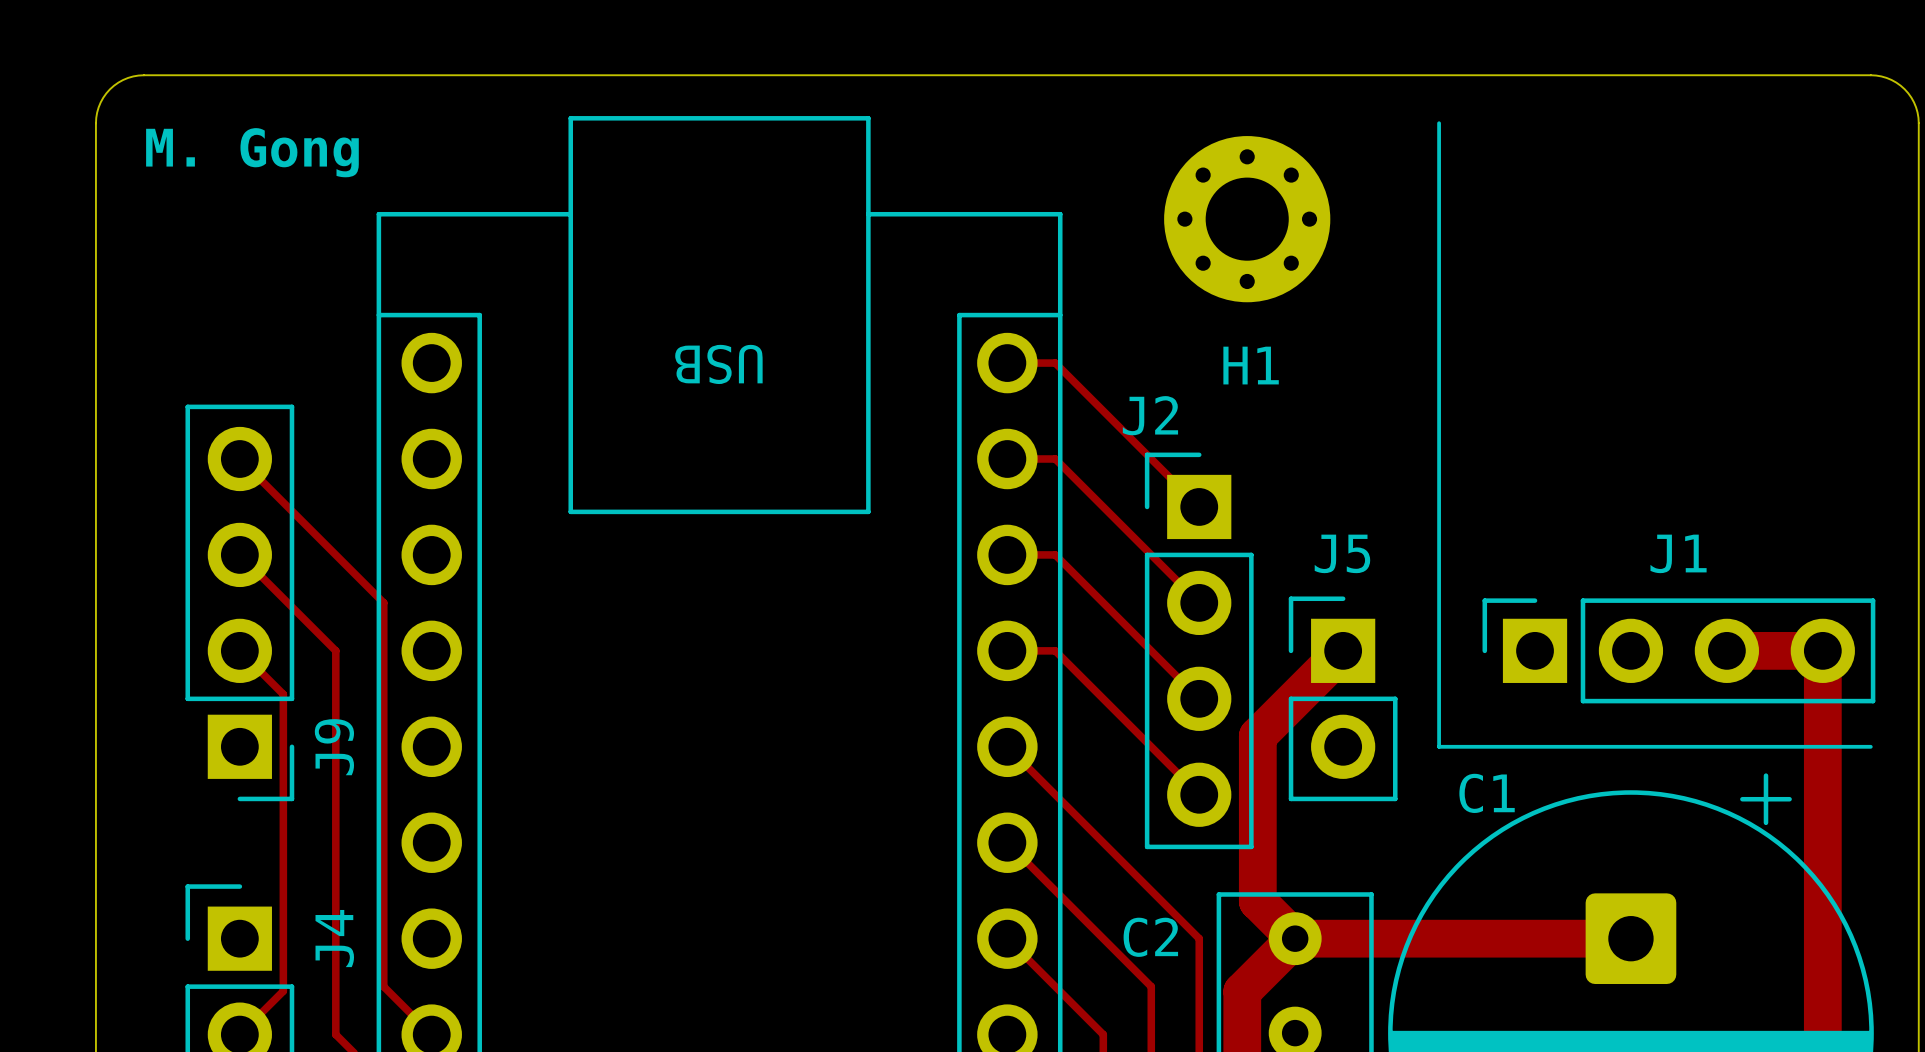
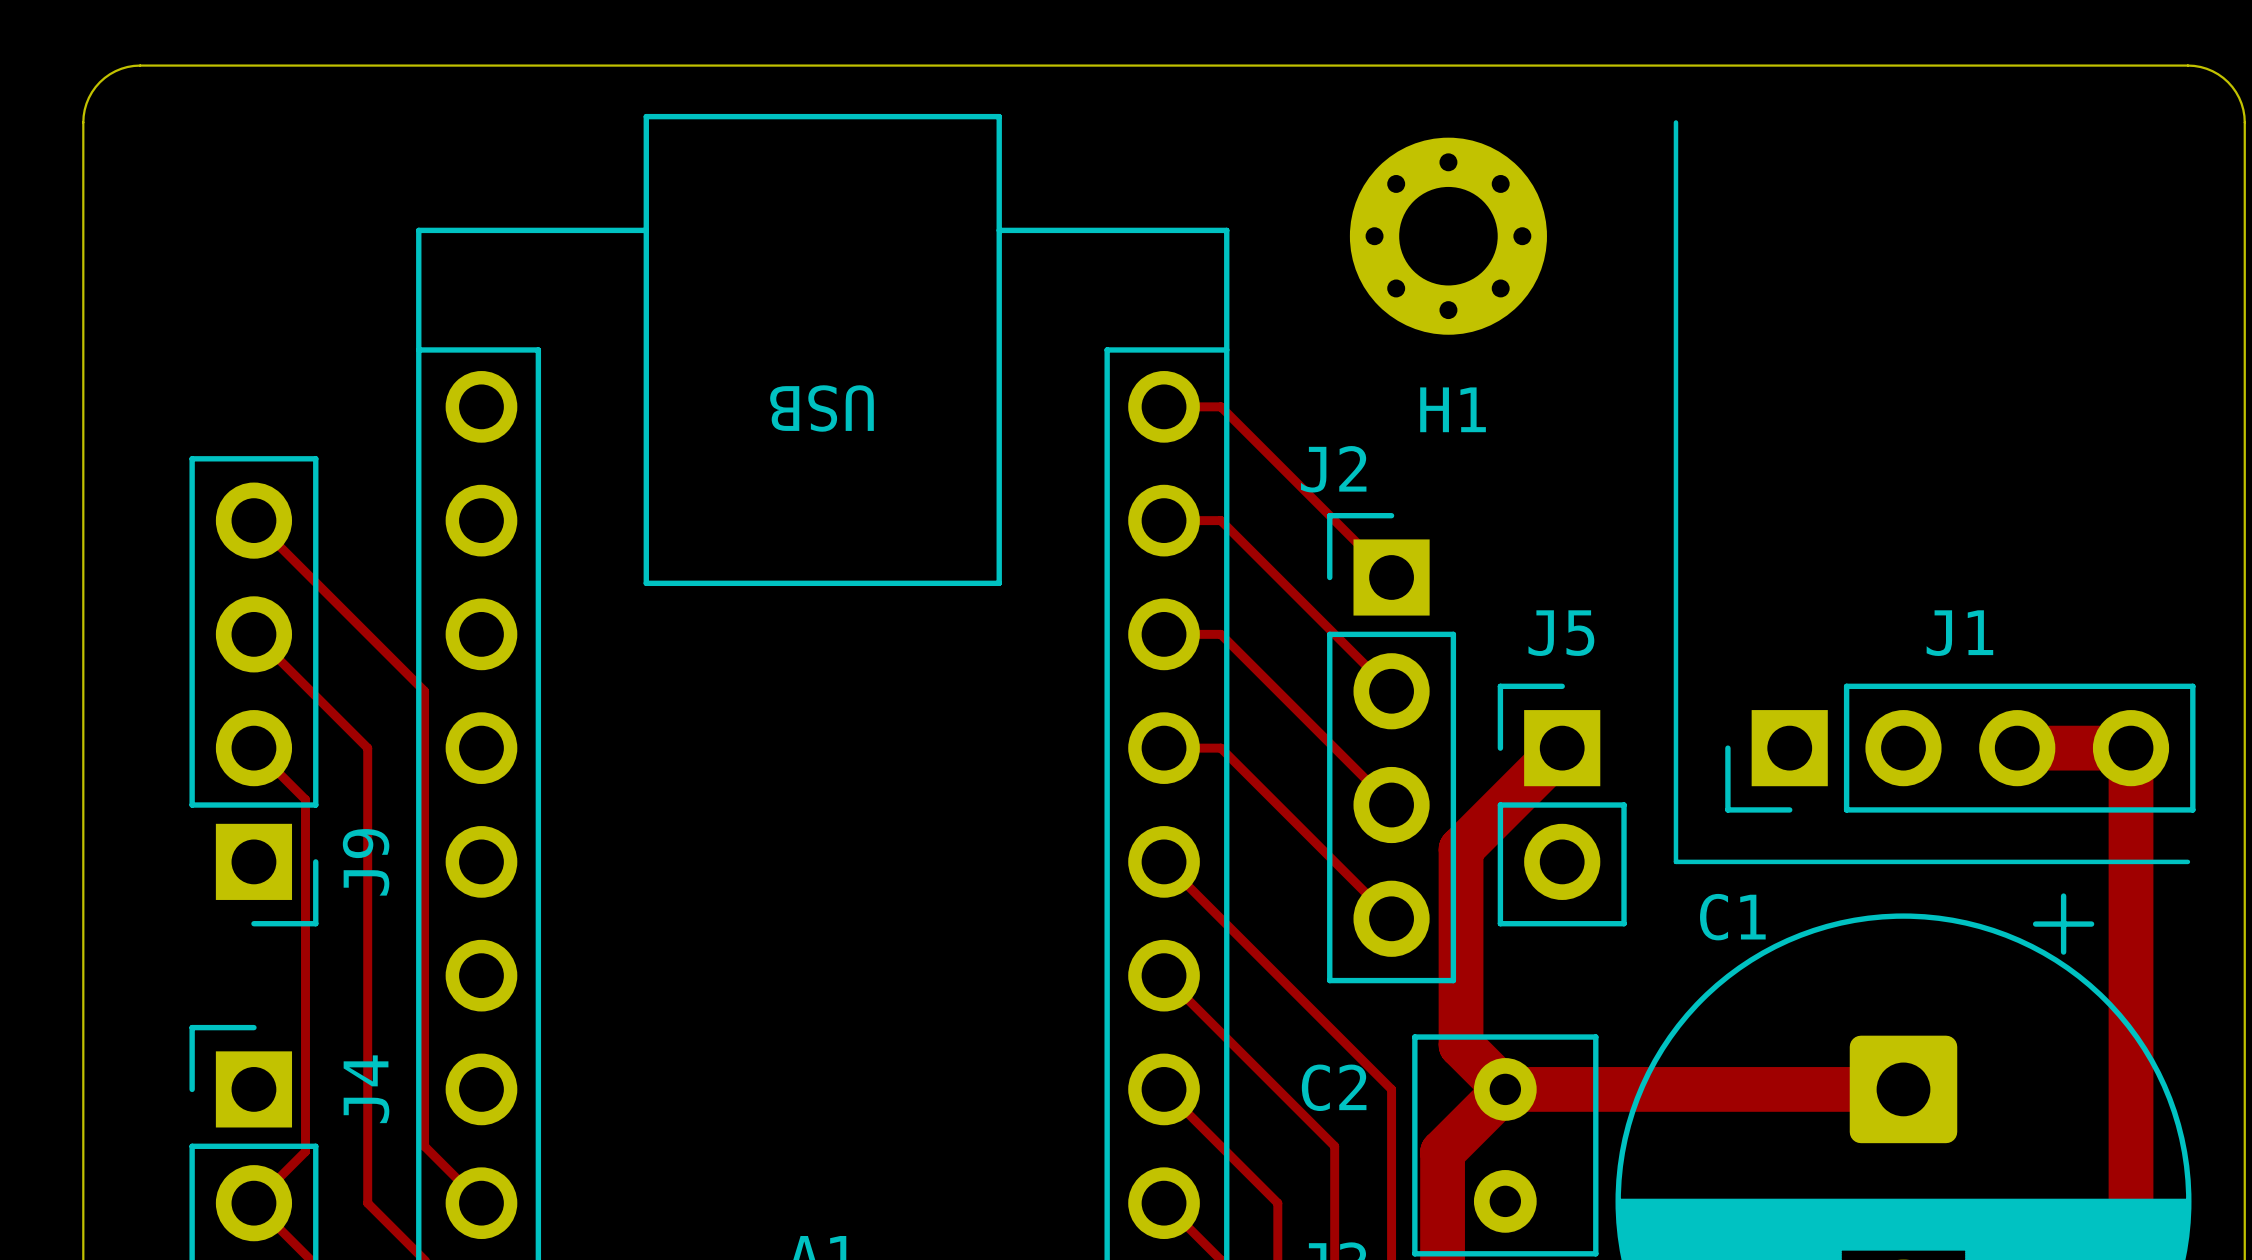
text: M. Gong (252, 152) -> none
J1 footprint: [1482, 598, 1876, 704] -> [1725, 683, 2196, 813]

